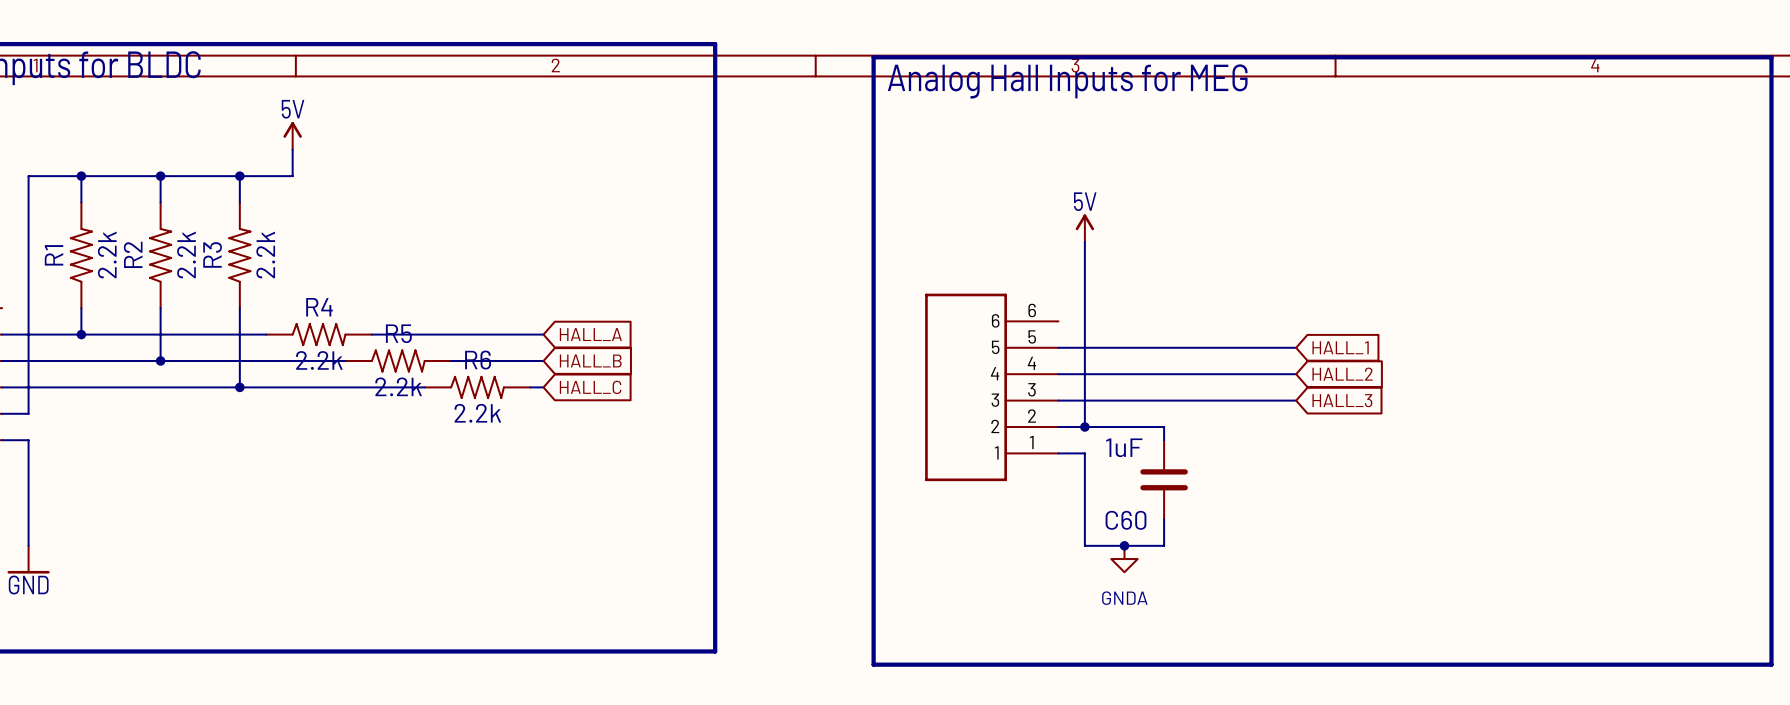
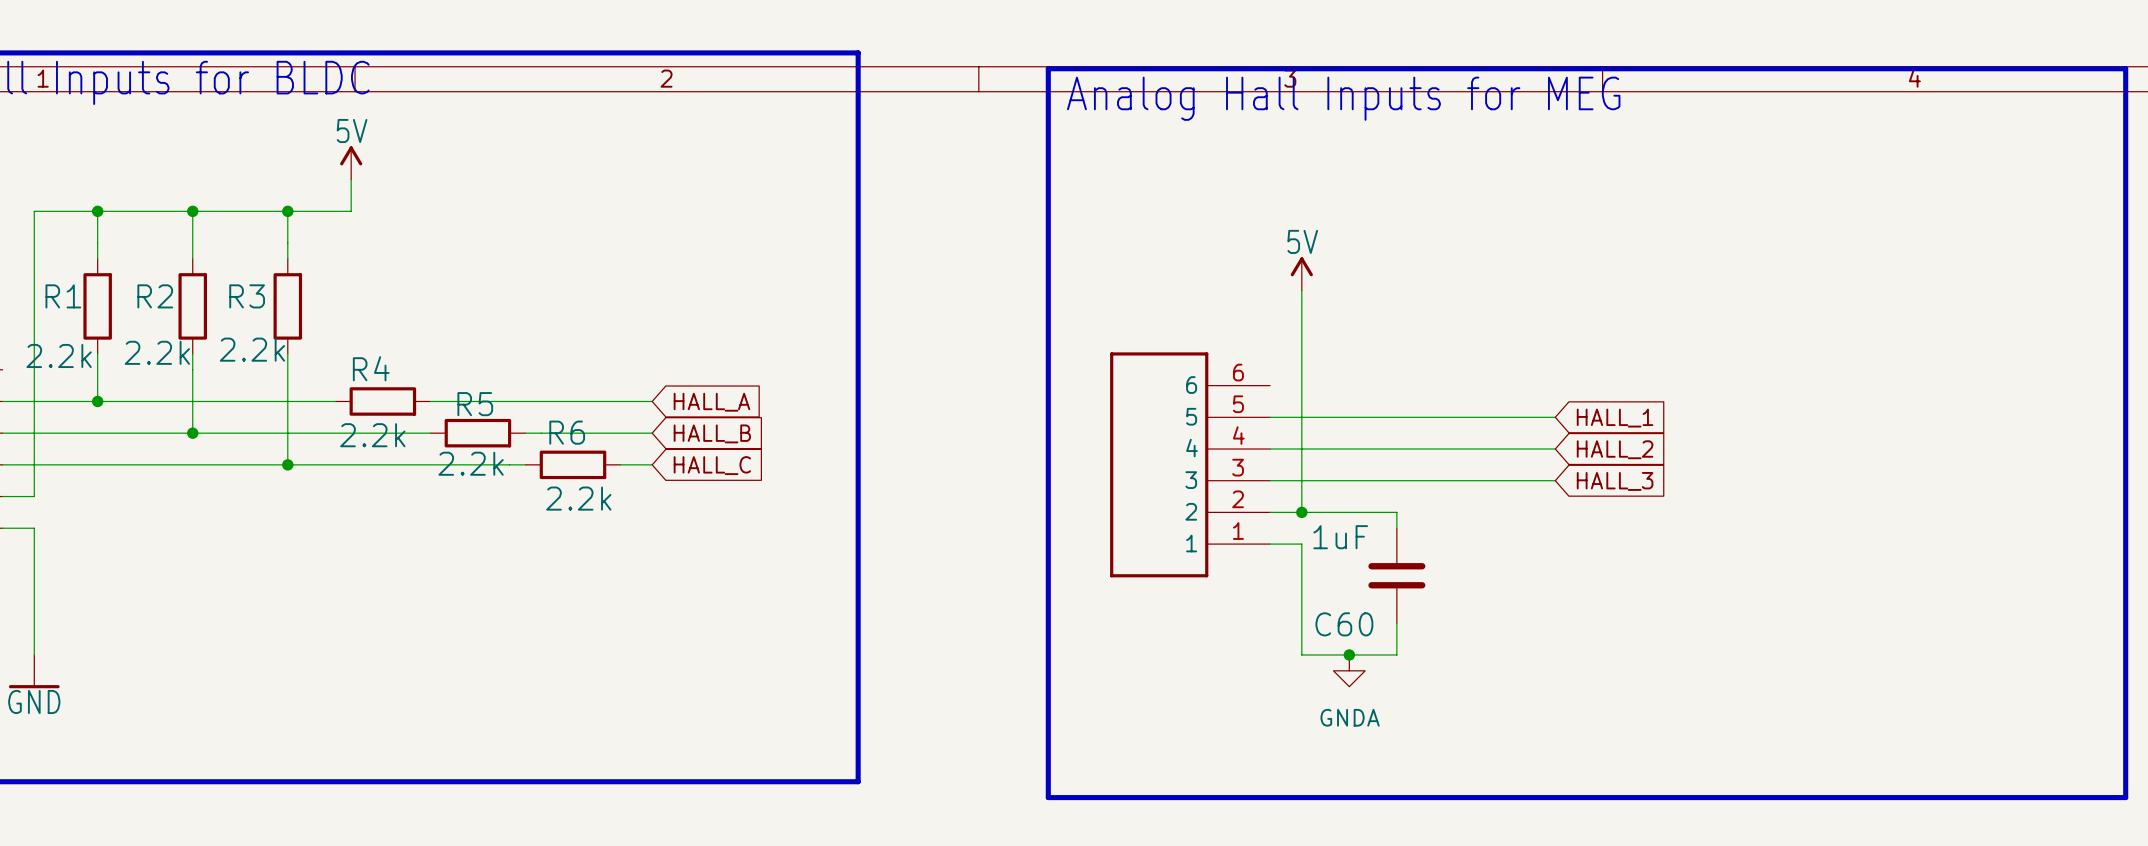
R1 symbol: [70, 202, 93, 309] -> [83, 258, 112, 354]
R2 symbol: [149, 202, 172, 309] -> [178, 258, 207, 354]
R3 symbol: [228, 202, 252, 309] -> [273, 258, 303, 354]
R1 value position: 2.2k (107, 255) -> 2.2k (59, 355)
R2 value position: 2.2k (186, 255) -> 2.2k (157, 352)
R3 value position: 2.2k (265, 255) -> 2.2k (252, 349)
R4 symbol: [266, 323, 372, 346] -> [335, 387, 431, 416]
R5 symbol: [345, 349, 452, 373] -> [430, 418, 526, 448]
R6 symbol: [424, 376, 531, 399] -> [525, 450, 621, 480]

